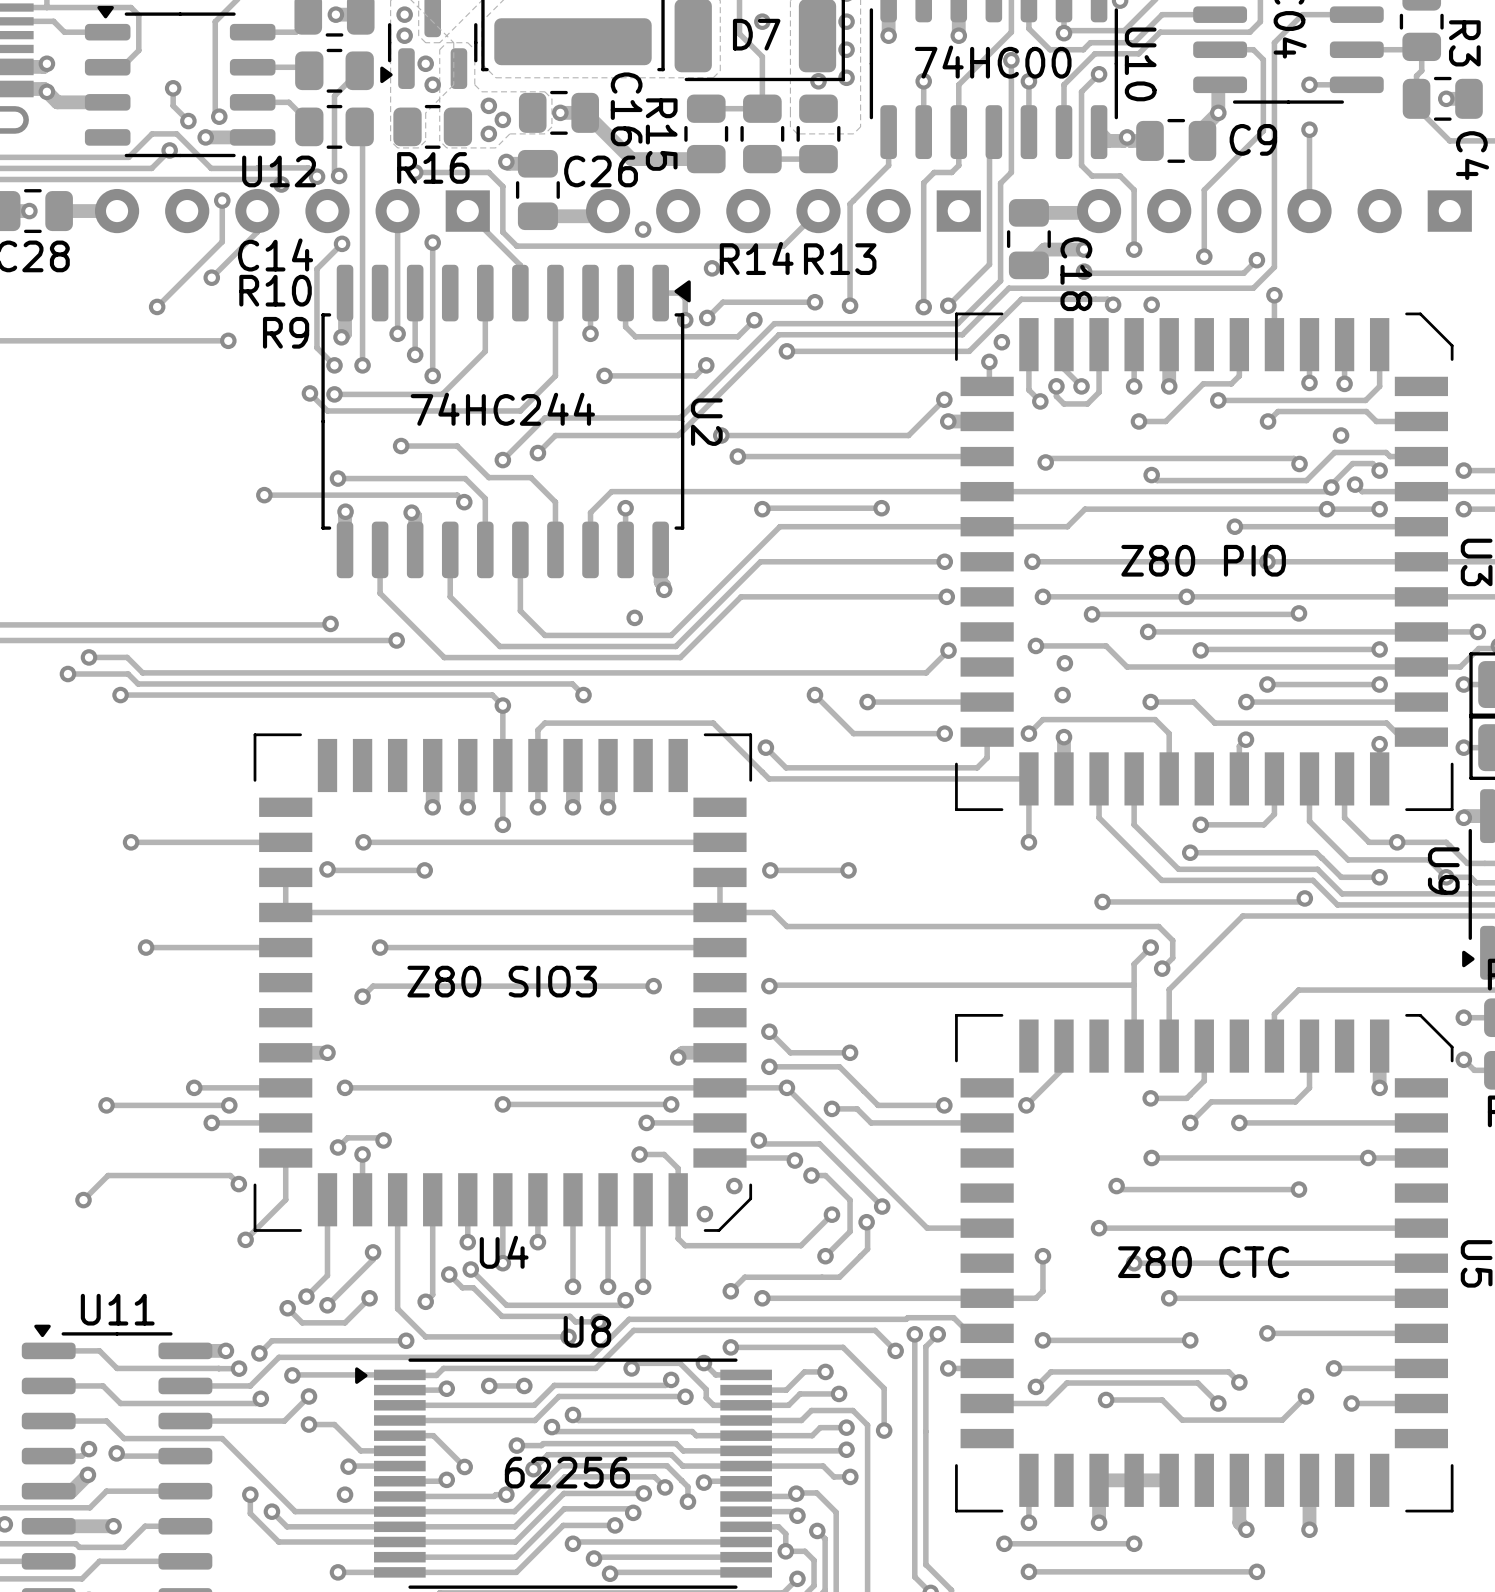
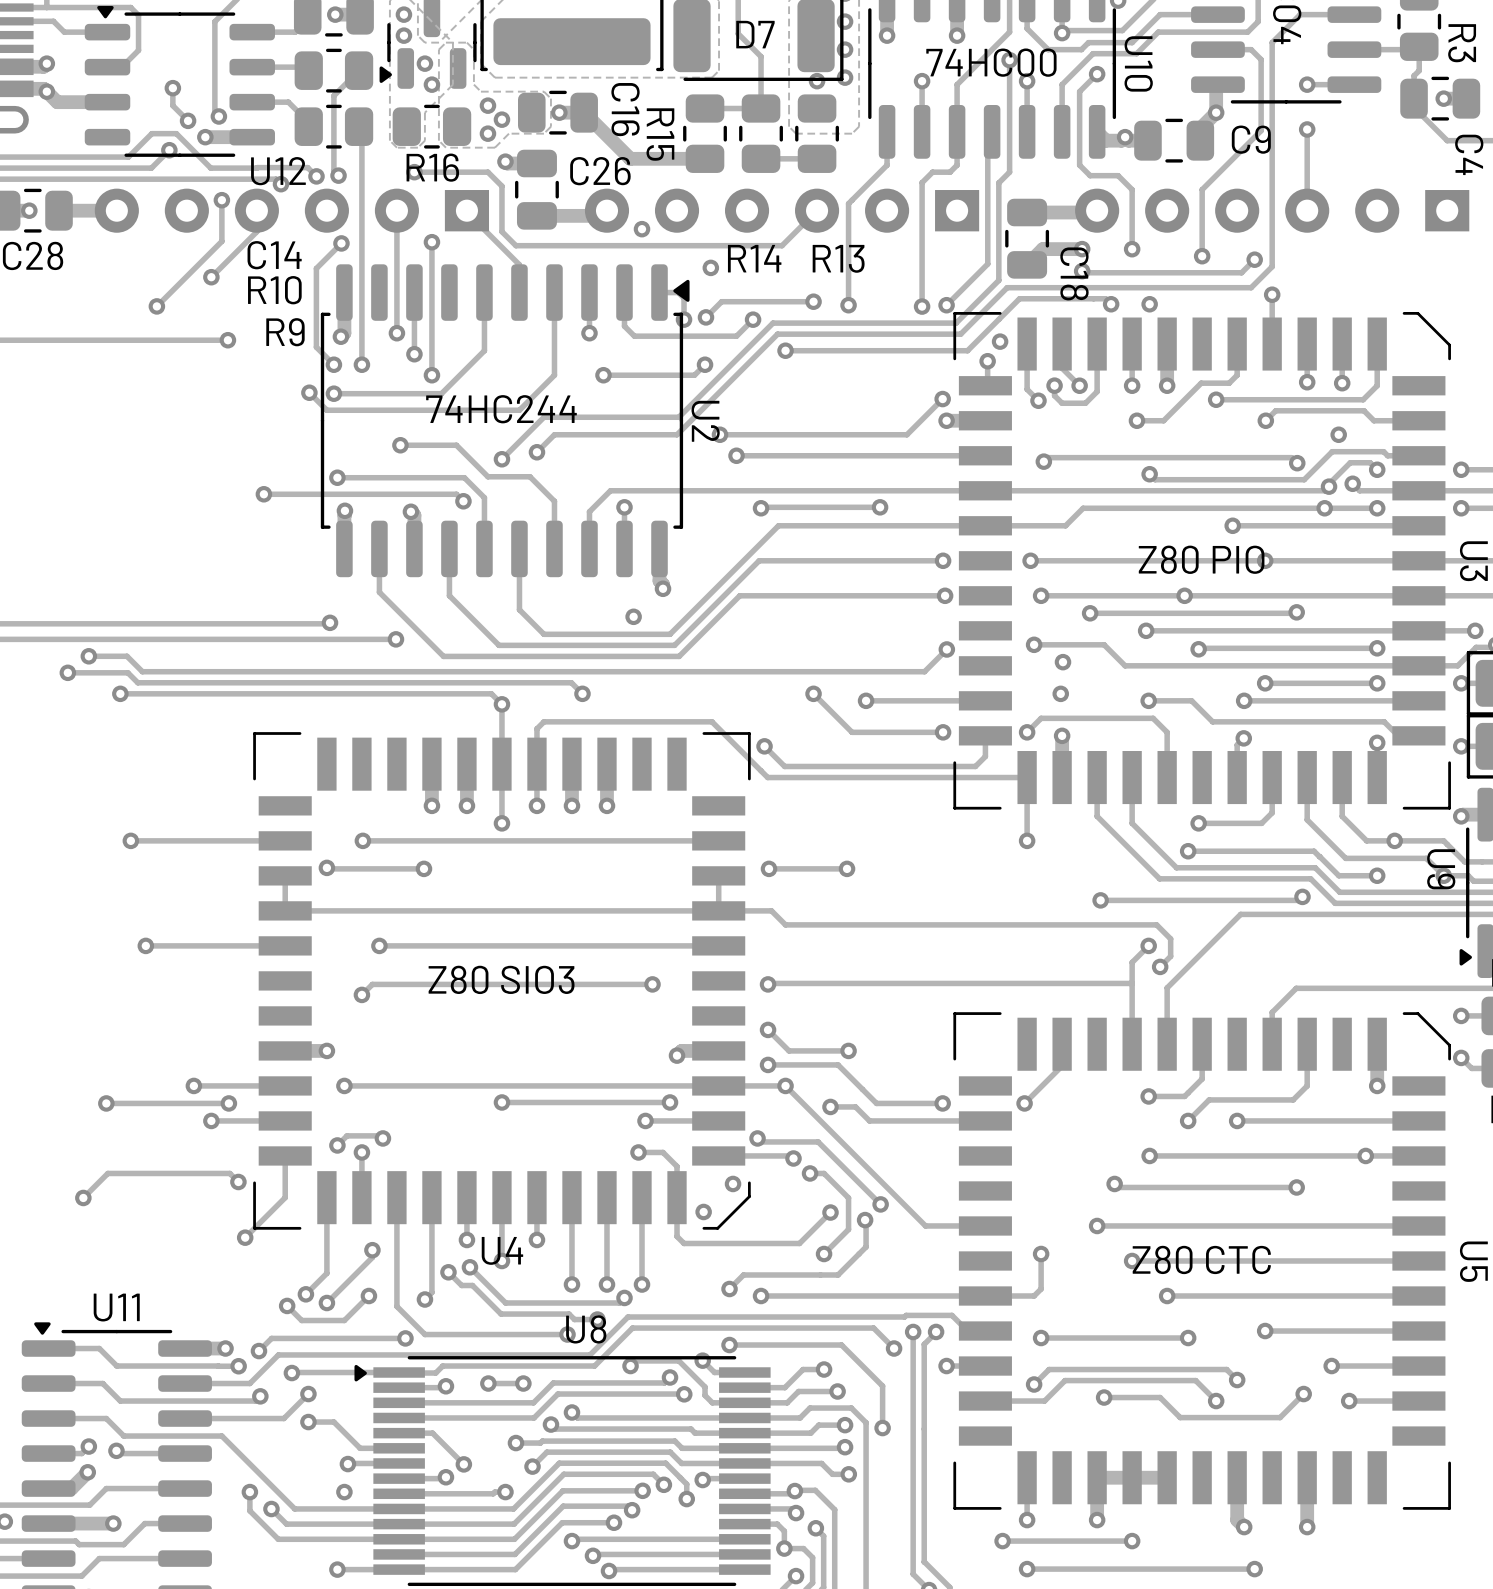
via: (762, 21) -> none
U8 value: 62256 (567, 1472) -> none

